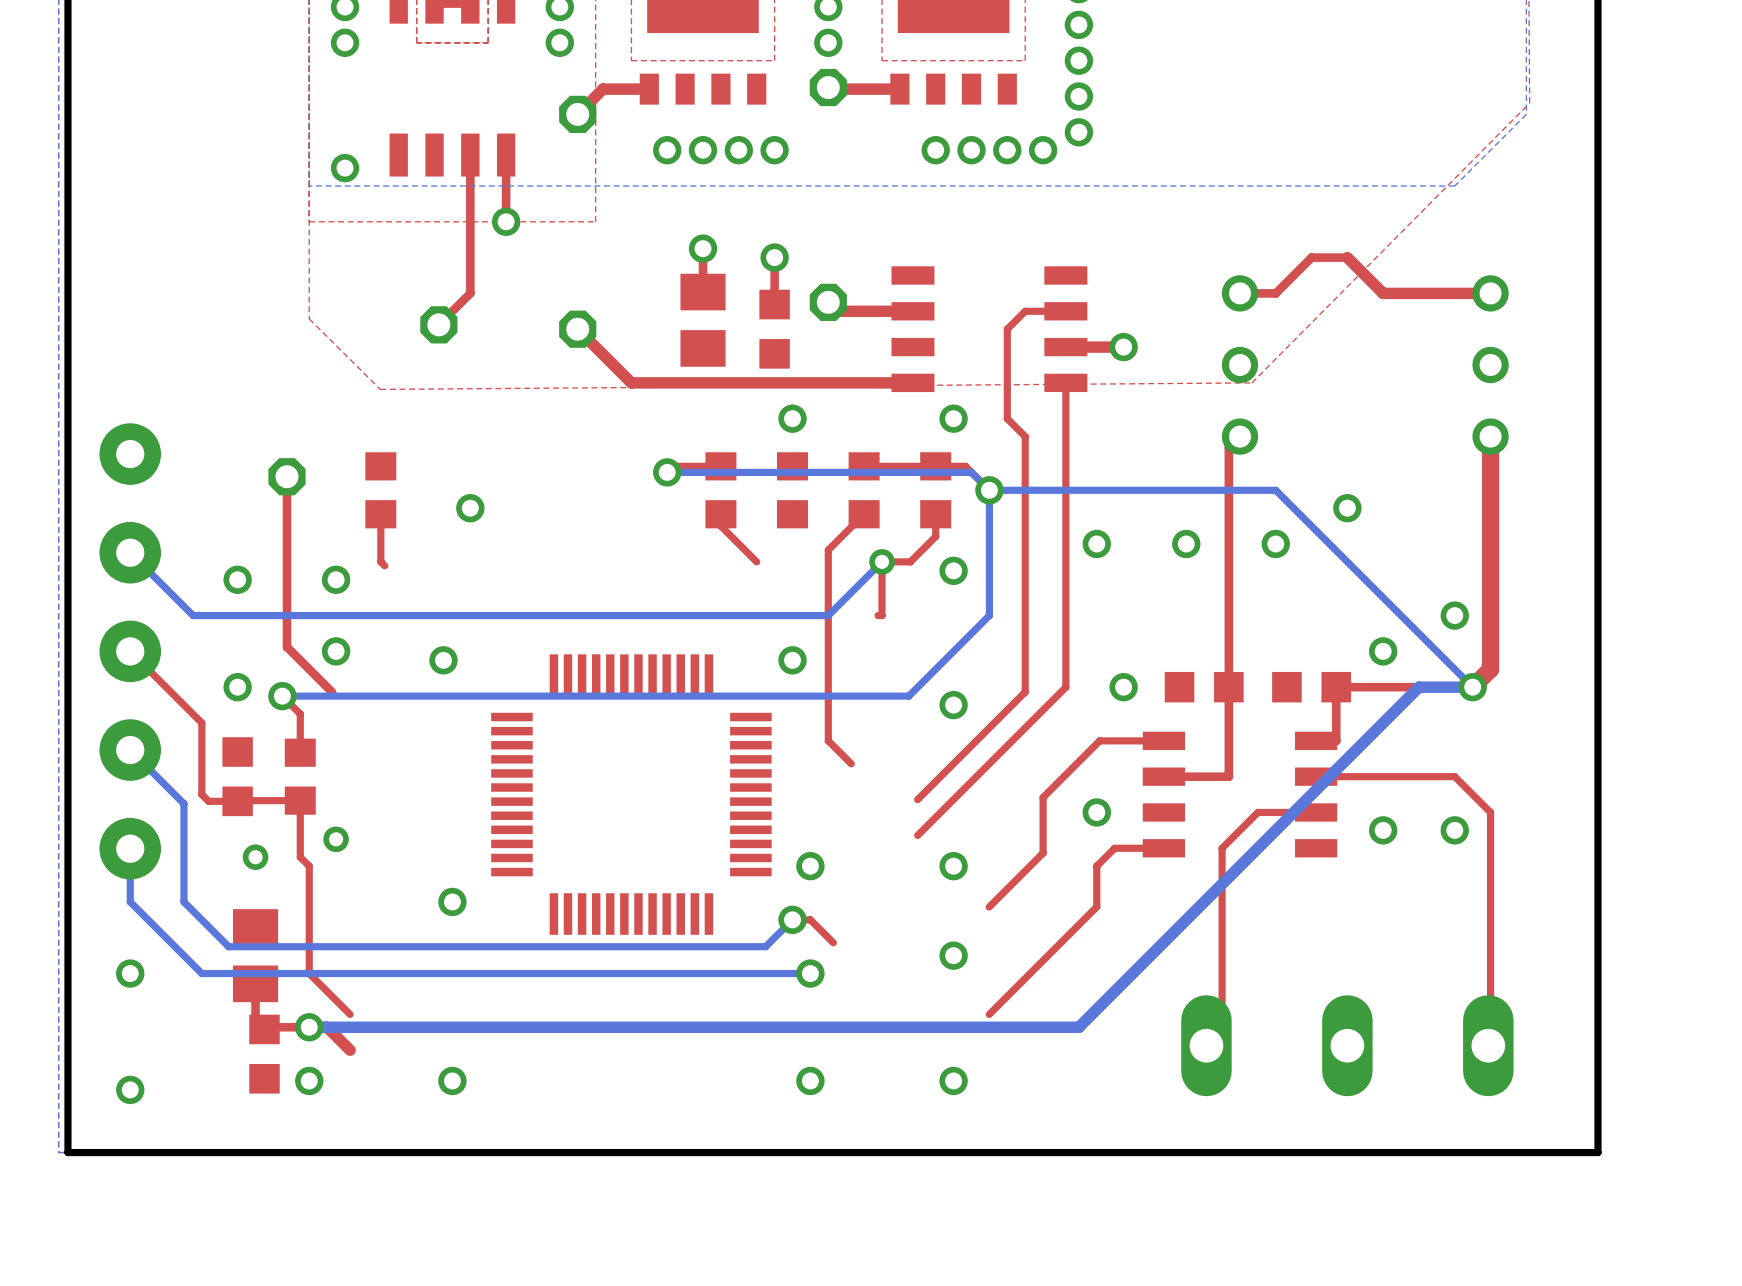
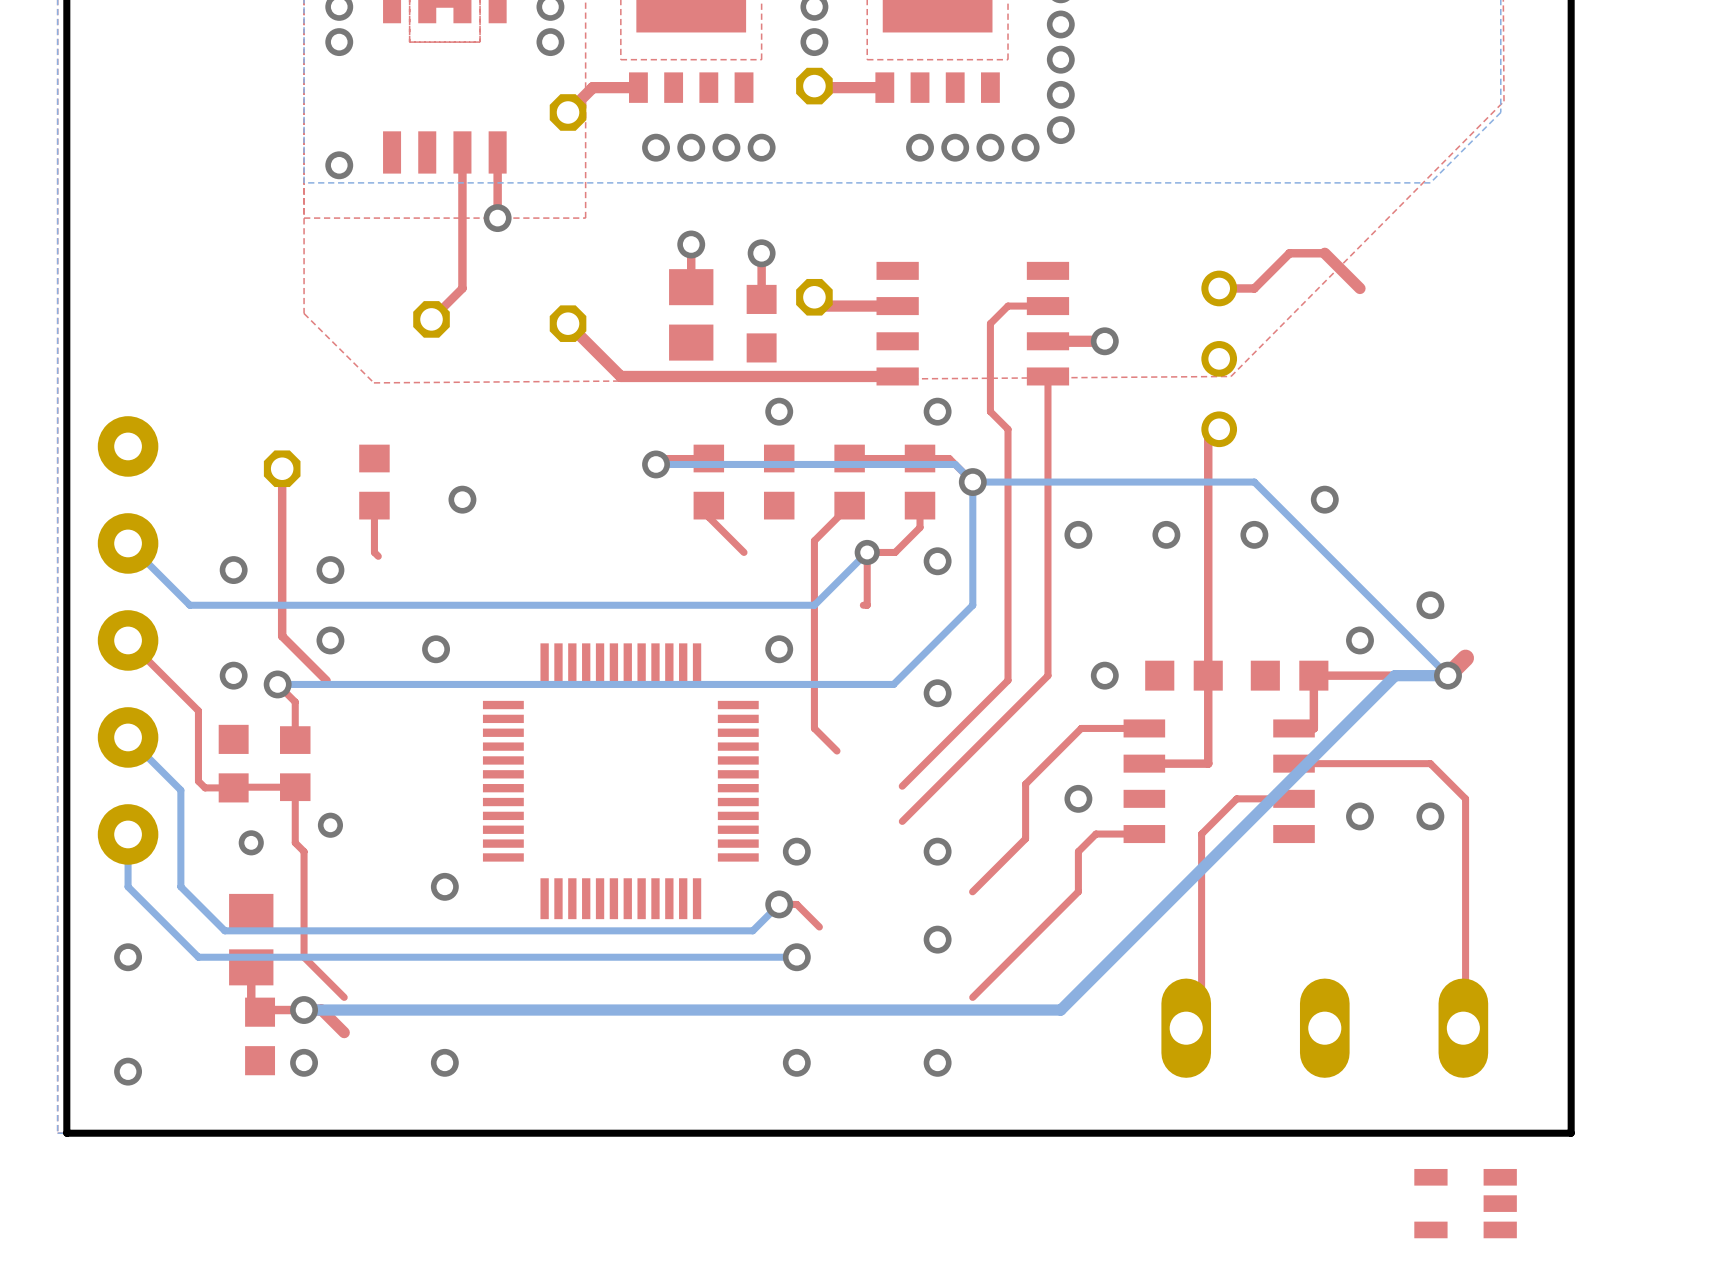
top track: (1490, 293) (1383, 293) -> none
part: (1490, 364) -> none
top track: (1490, 436) (1490, 669) -> none
part: none -> (1465, 1203)

